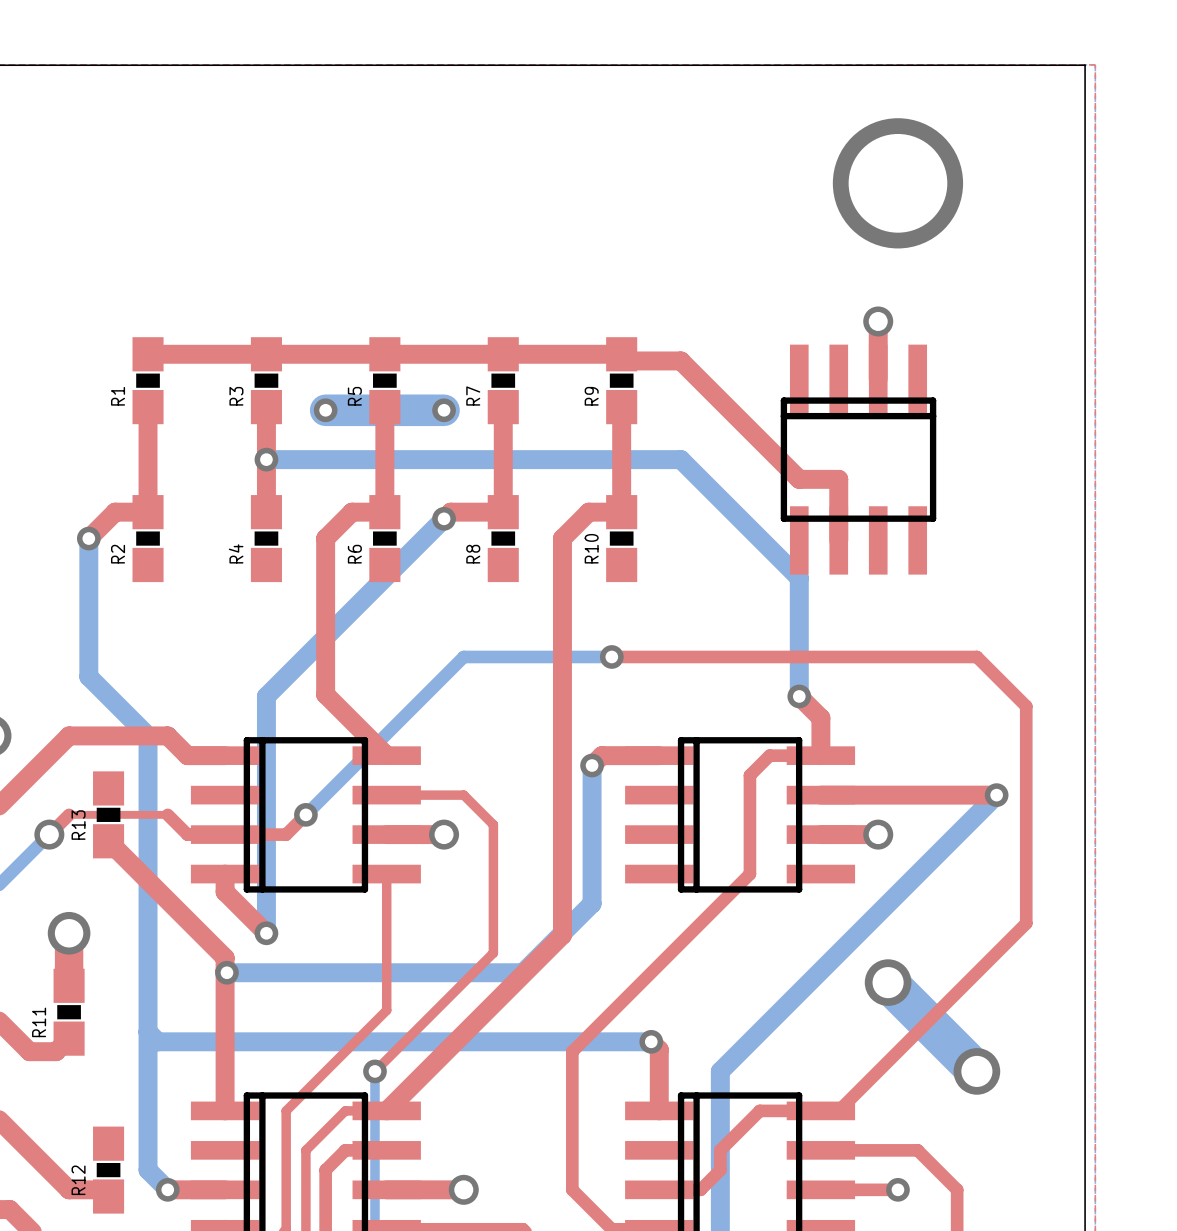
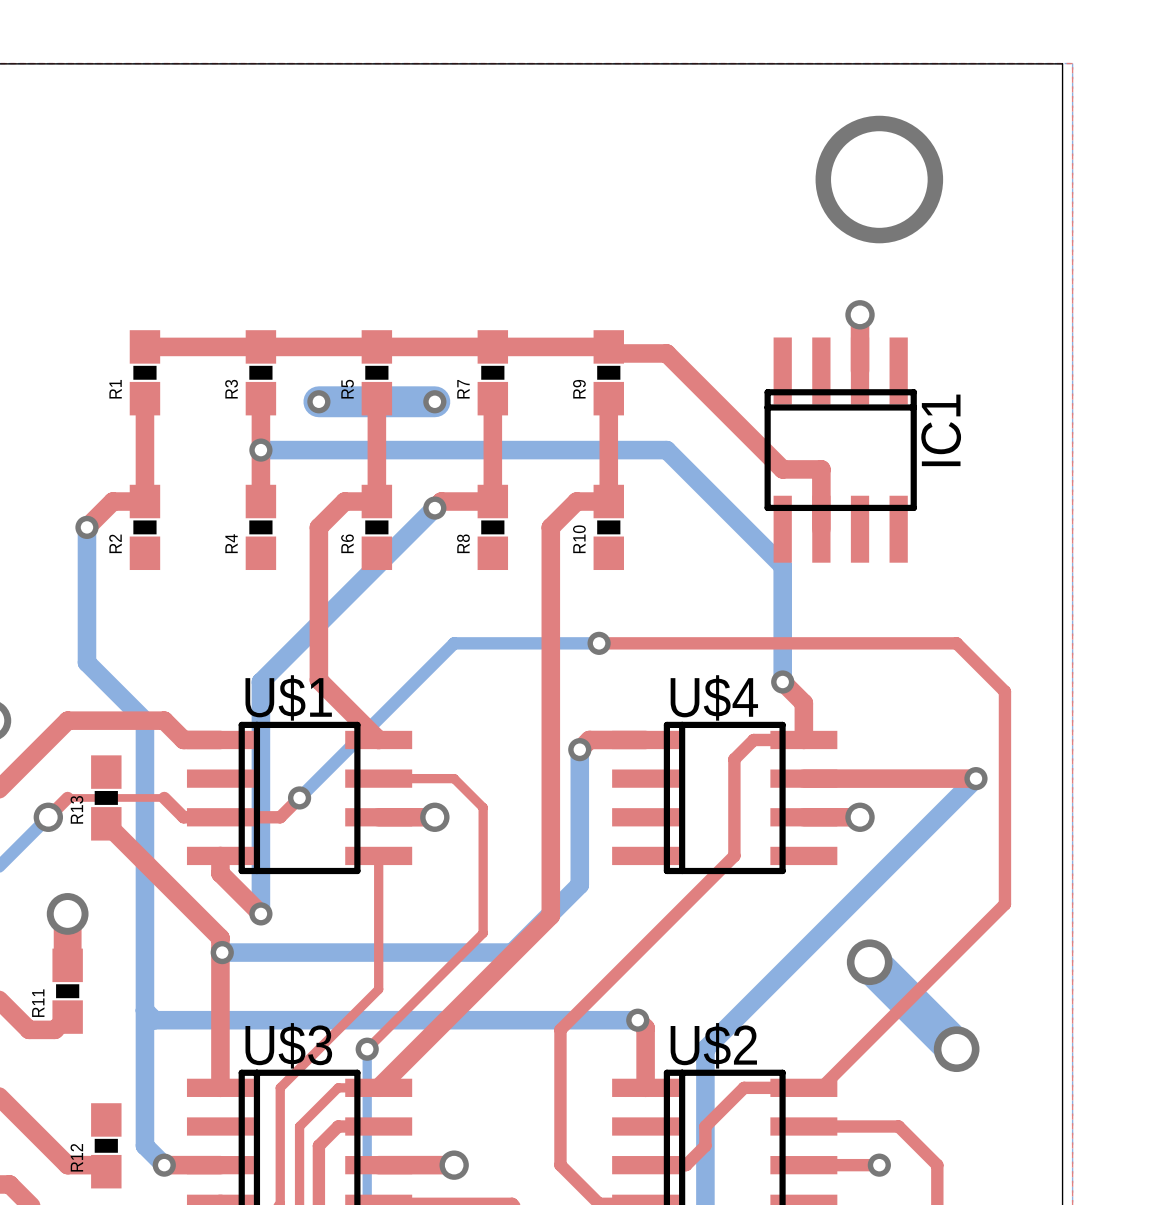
IC1 name: none -> IC1 (941, 430)
U$1 name: none -> U$1 (288, 697)
U$4 name: none -> U$4 (714, 697)
U$3 name: none -> U$3 (288, 1045)
U$2 name: none -> U$2 (713, 1045)

